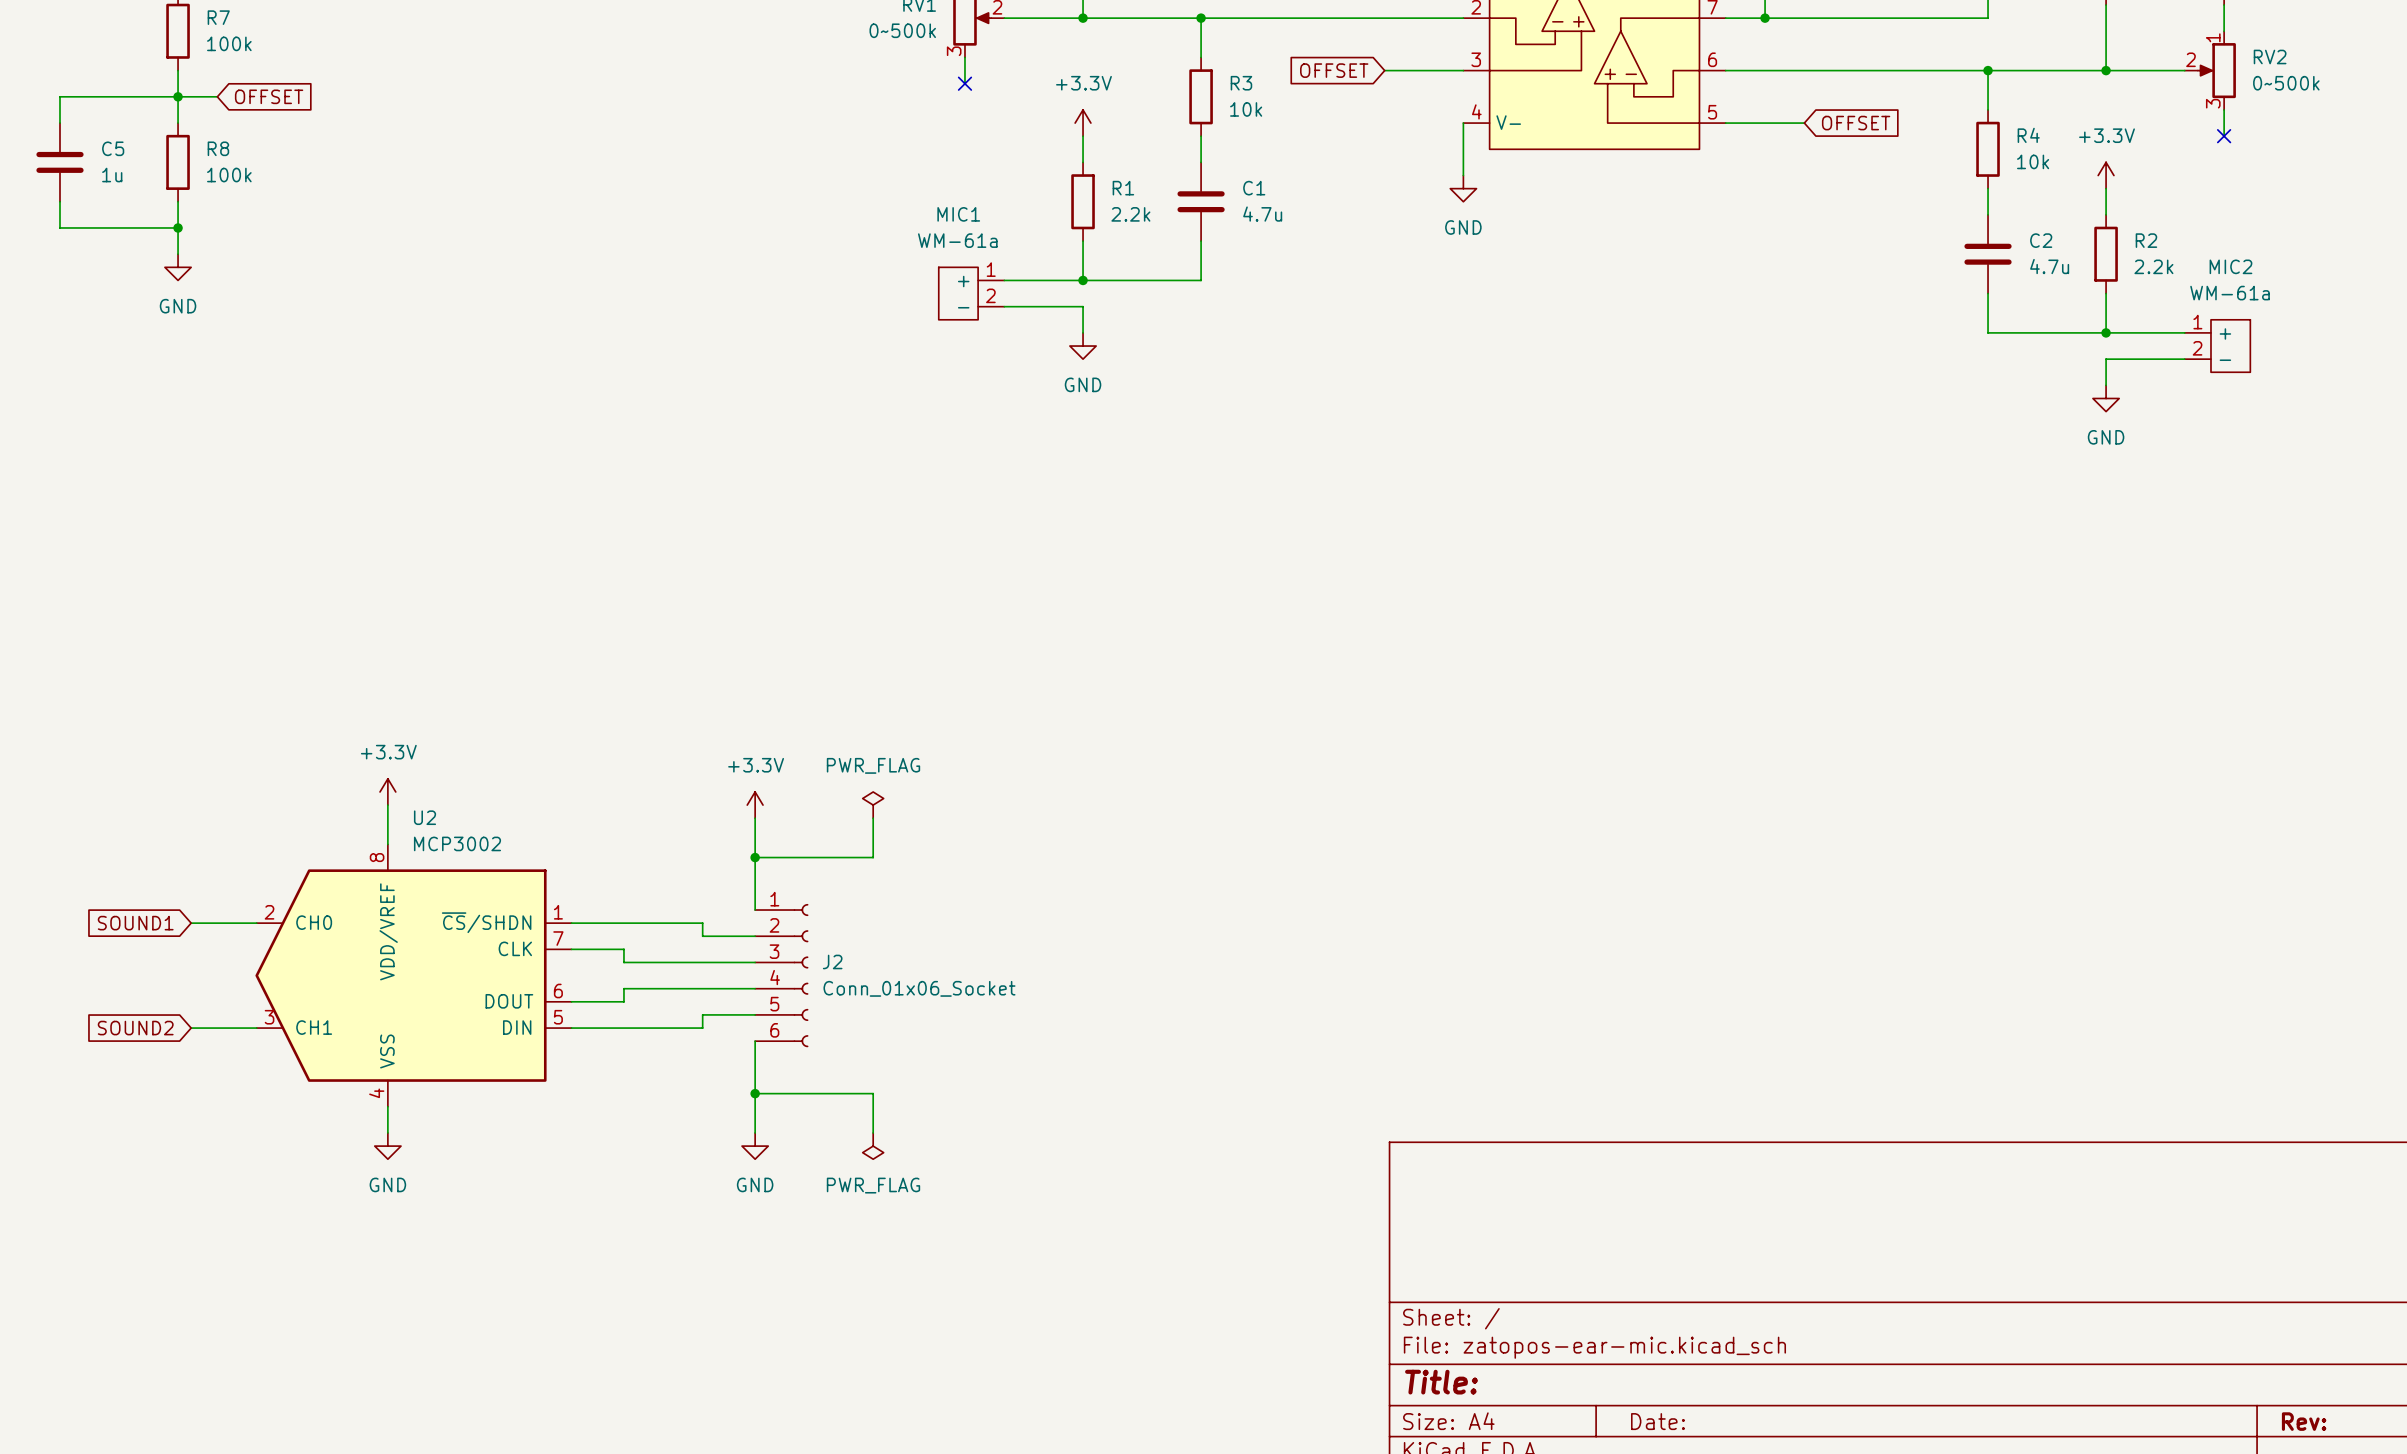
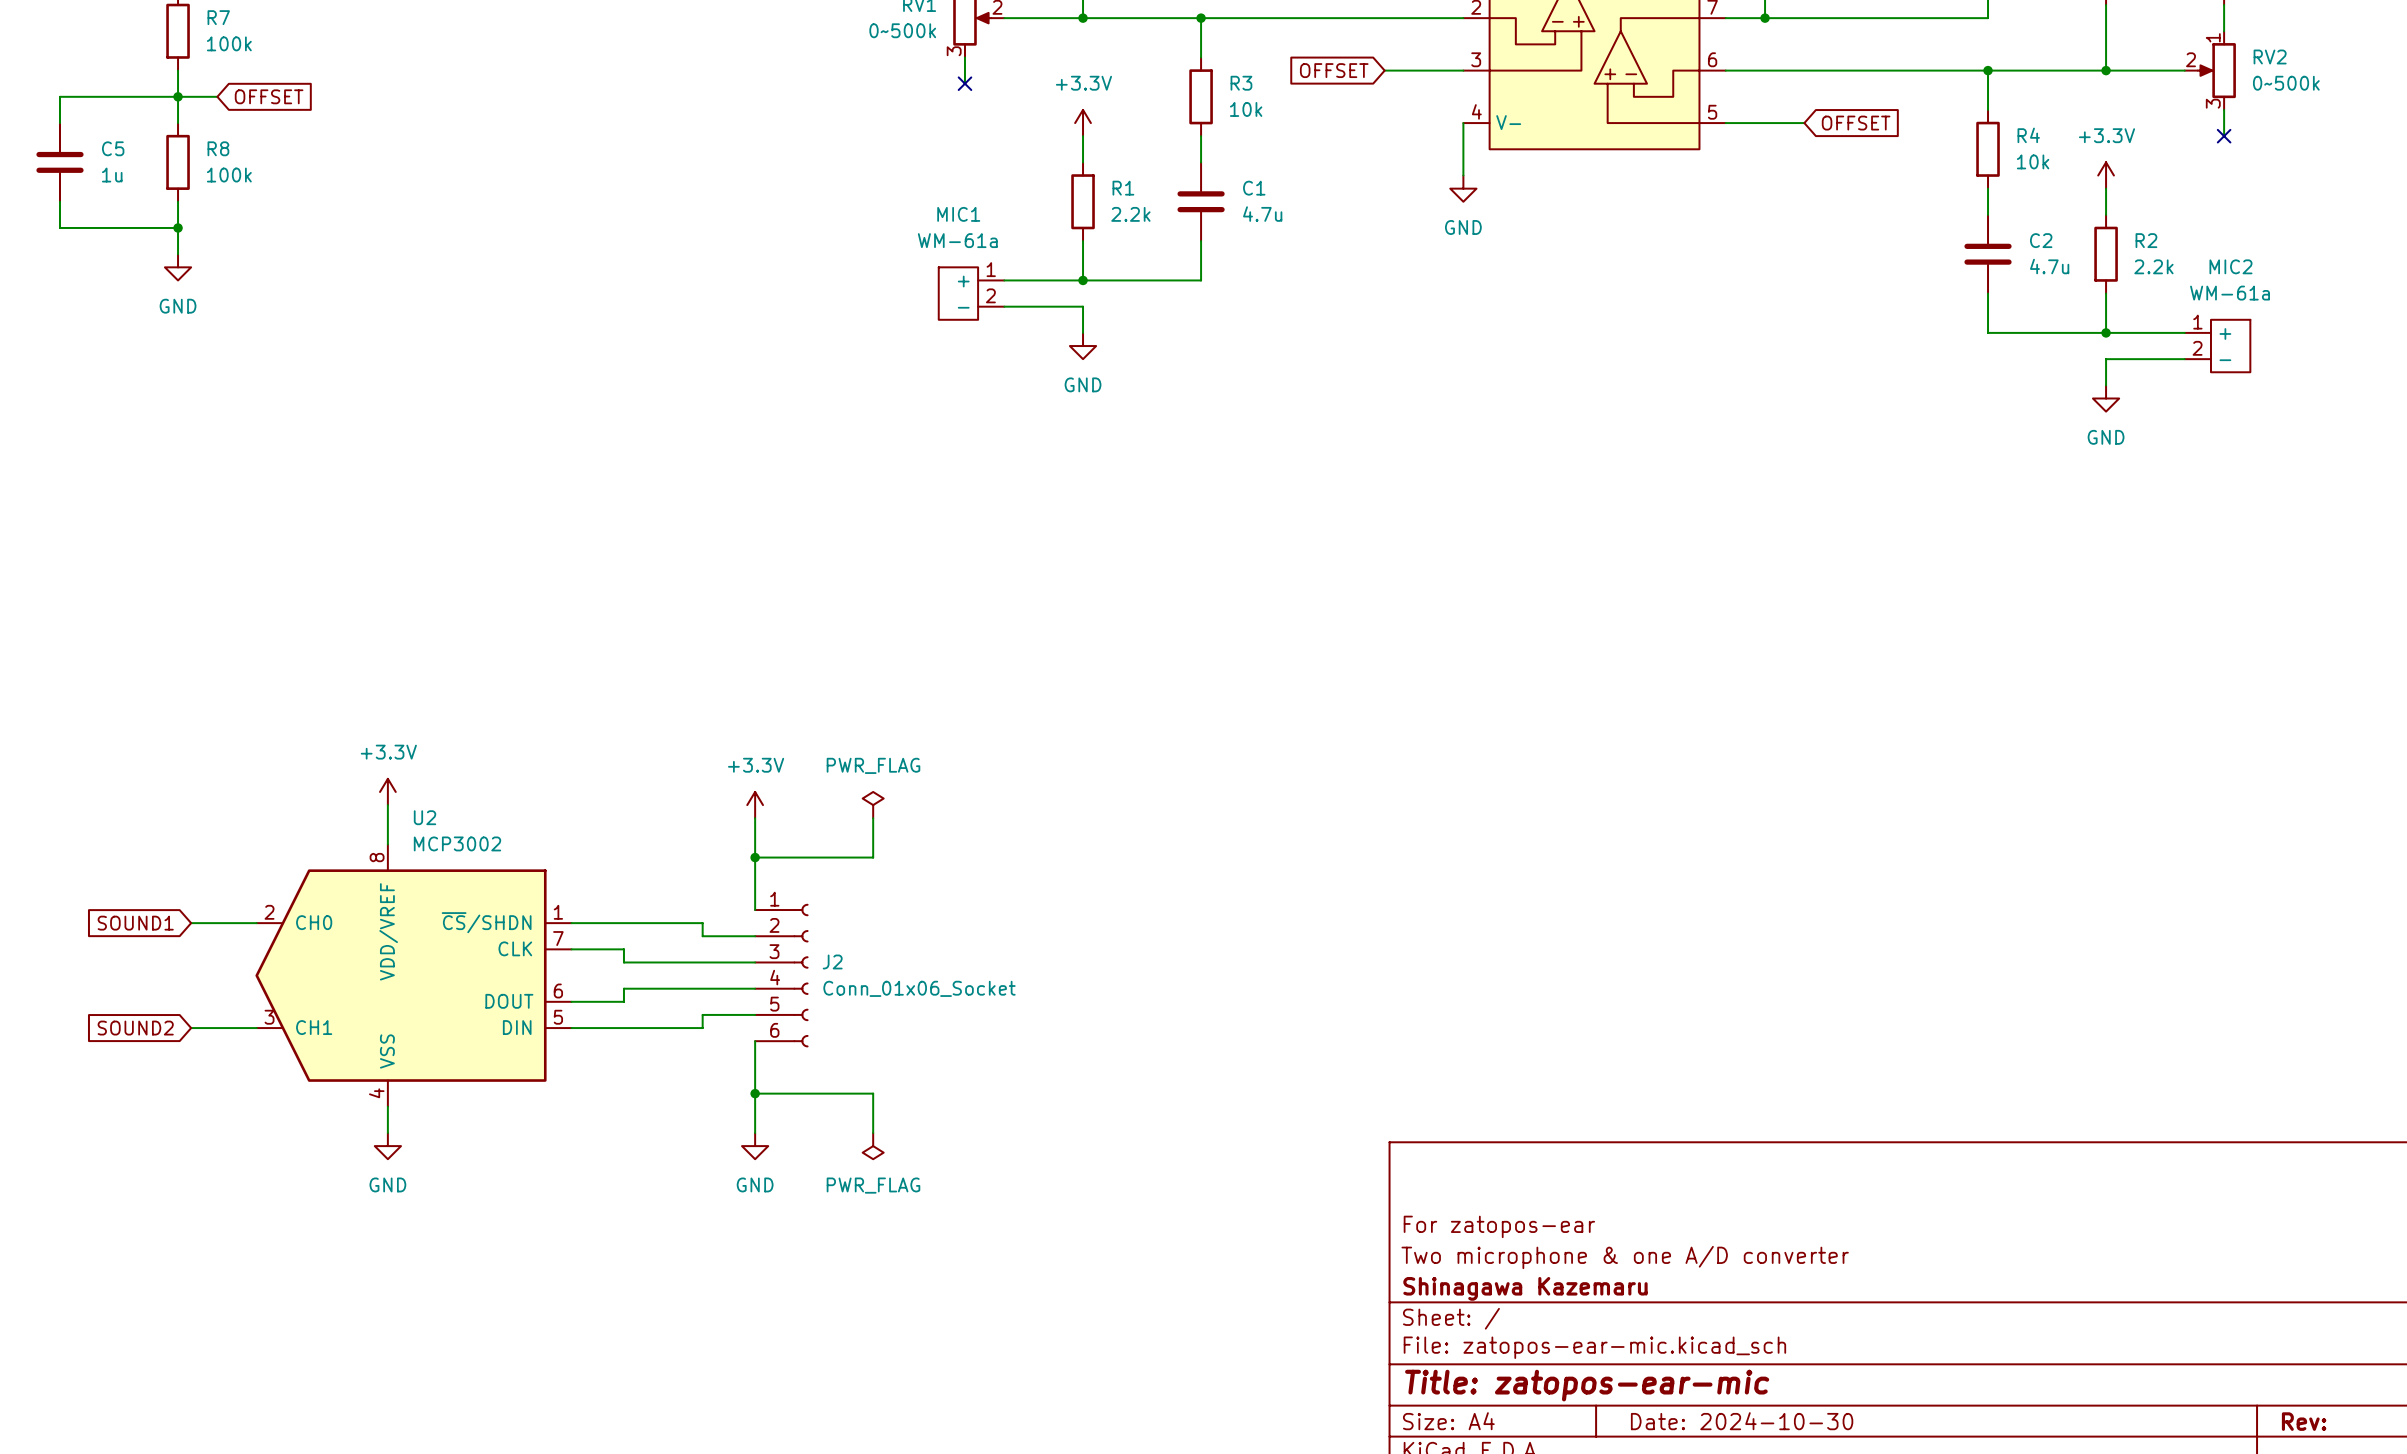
title block: none -> For zatopos-ear (1499, 1226)
title block: none -> Two microphone & one A/D converter (1625, 1257)
title block: none -> Shinagawa Kazemaru (1525, 1288)
title block: Title: (1441, 1382) -> Title: zatopos-ear-mic (1587, 1385)
title block: Date: (1657, 1421) -> Date: 2024-10-30 (1742, 1421)

